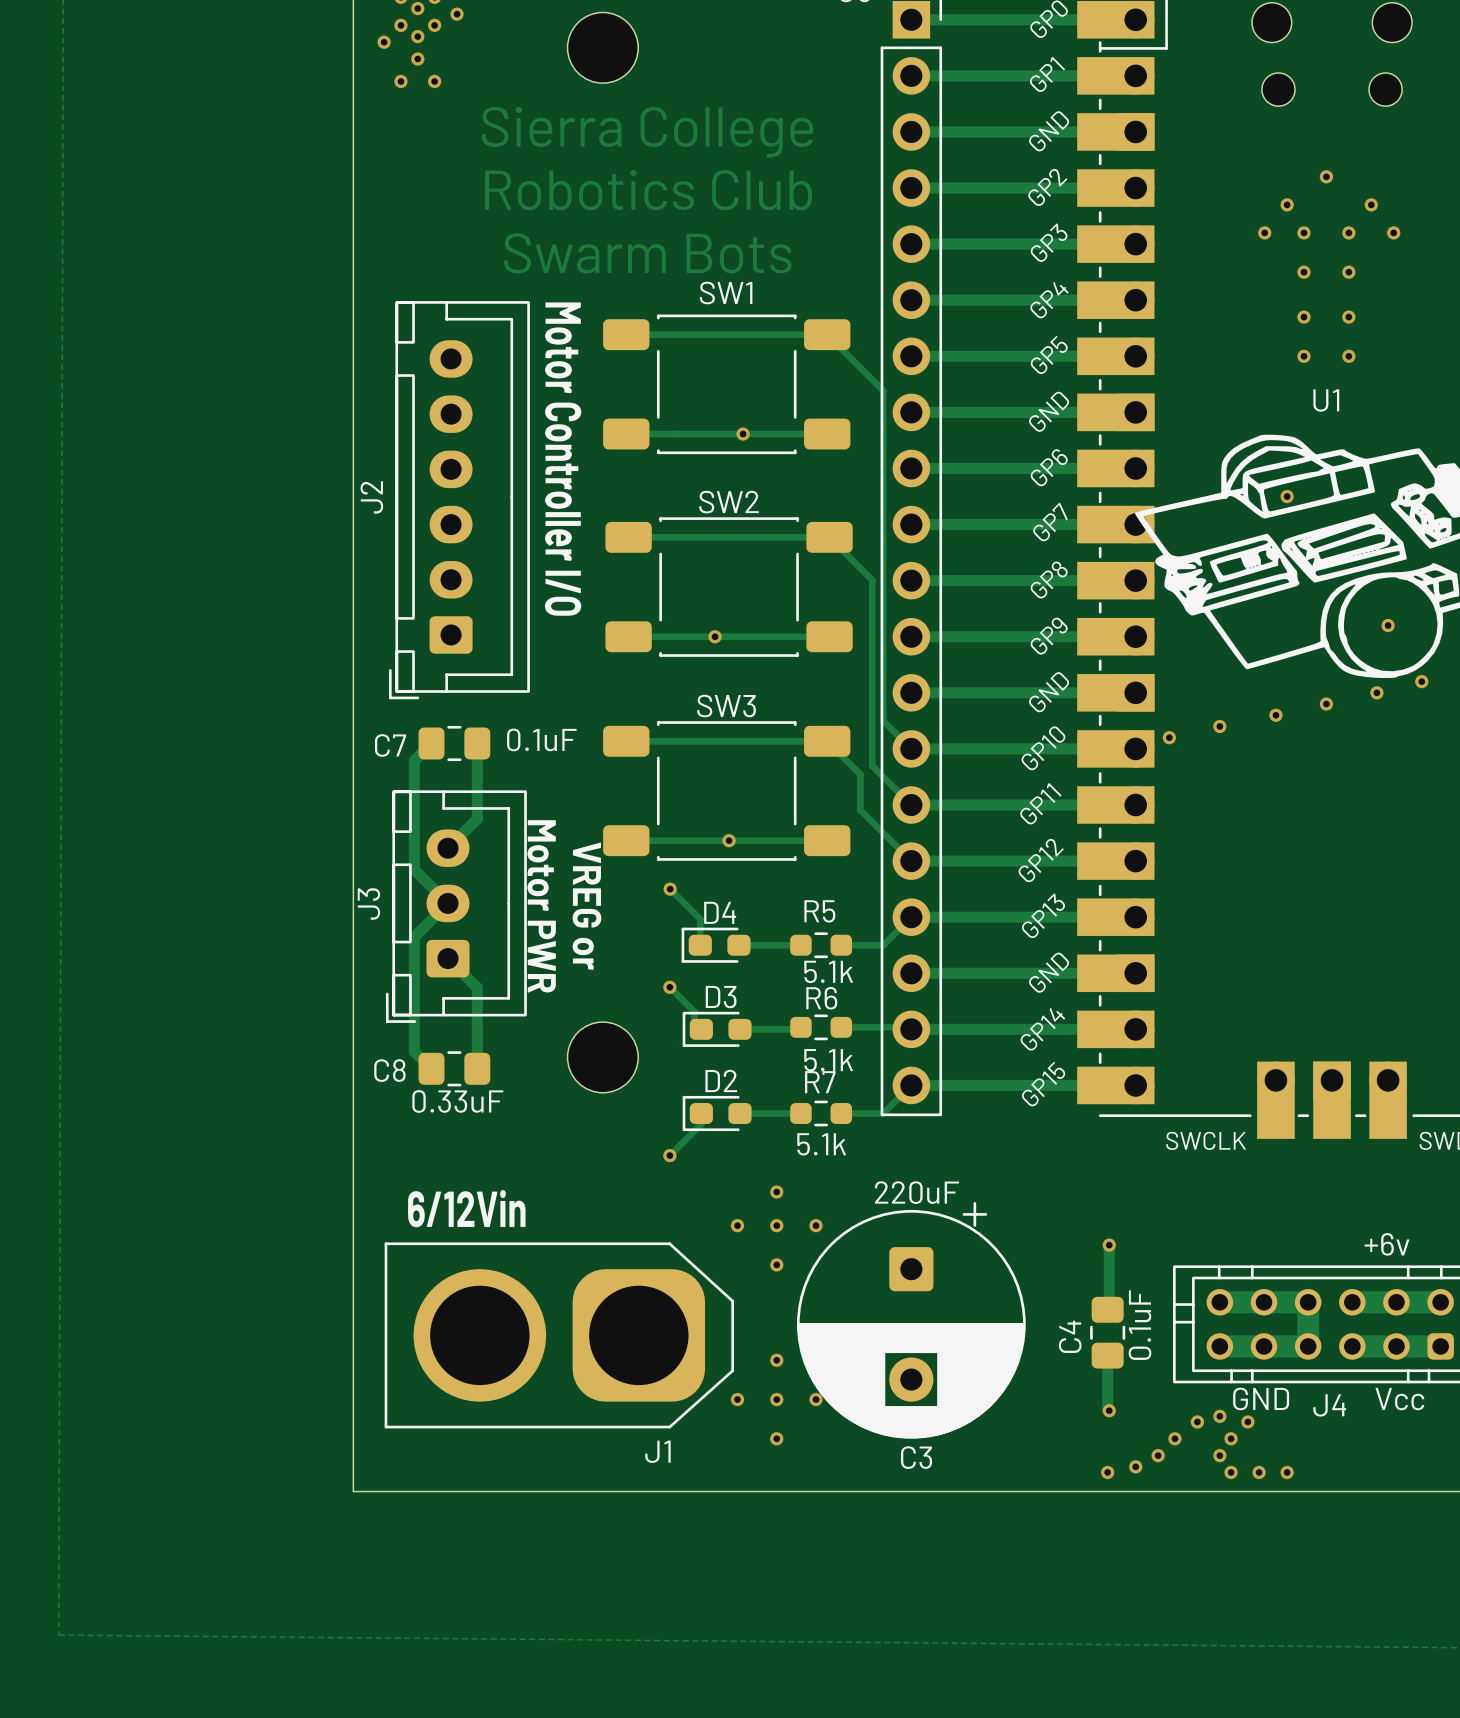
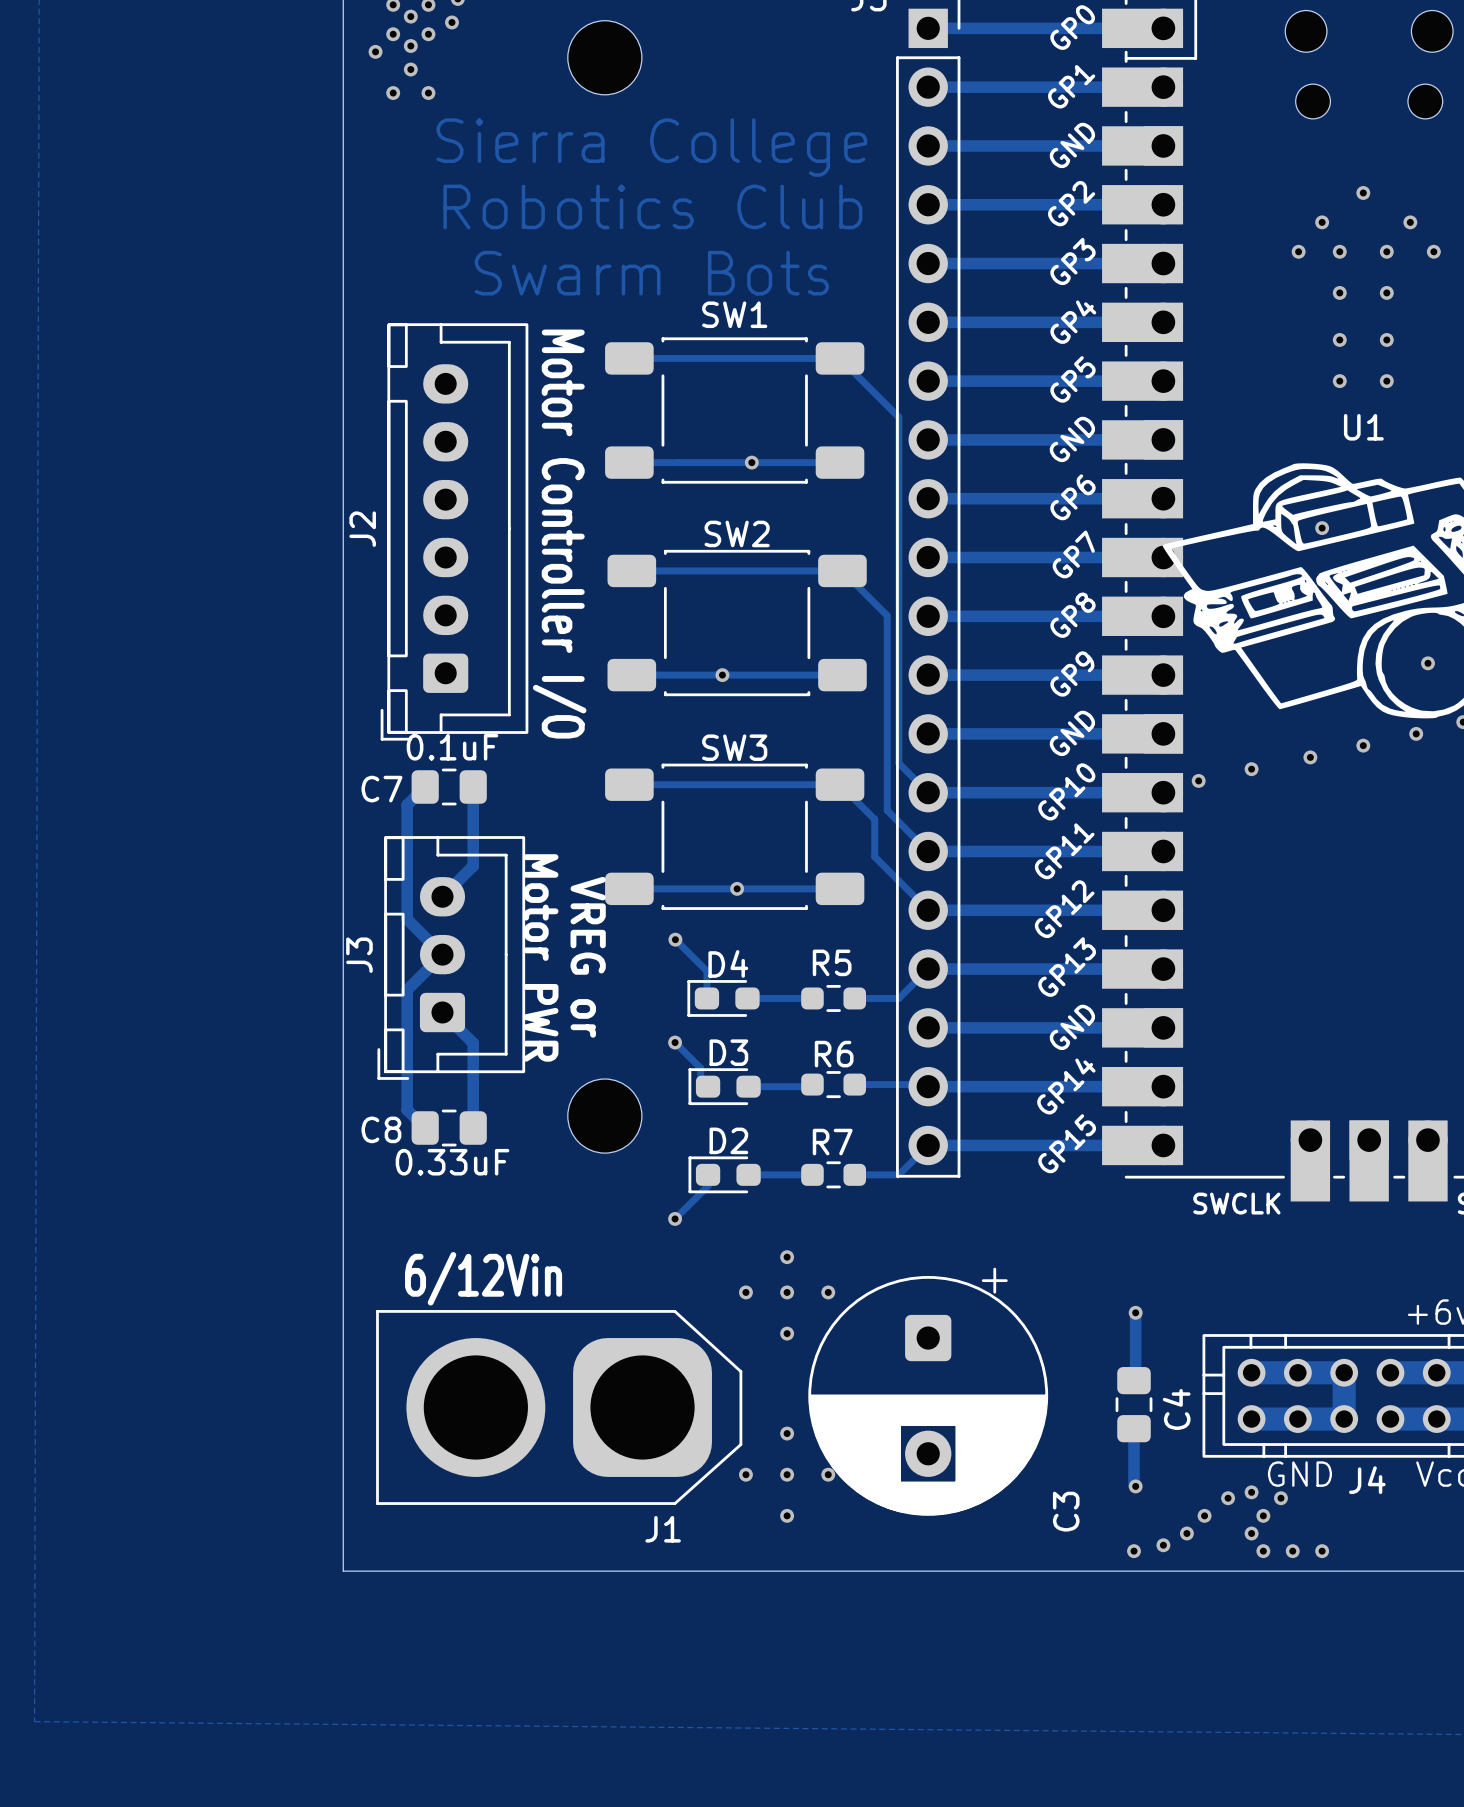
C7 value position: 0.1uF (541, 739) -> 0.1uF (452, 747)
R5 value: 5.1k (828, 971) -> none
R6 value: 5.1k (828, 1060) -> none
R7 value: 5.1k (821, 1144) -> none
C3 value: 220uF (916, 1192) -> none
C4 value: 0.1uF (1139, 1325) -> none
C4 name position: C4 (1070, 1336) -> C4 (1176, 1409)
C3 name rotation: 0° (916, 1457) -> 90° counterclockwise (1066, 1511)
C3 name position: C3 (916, 1457) -> C3 (1066, 1511)

